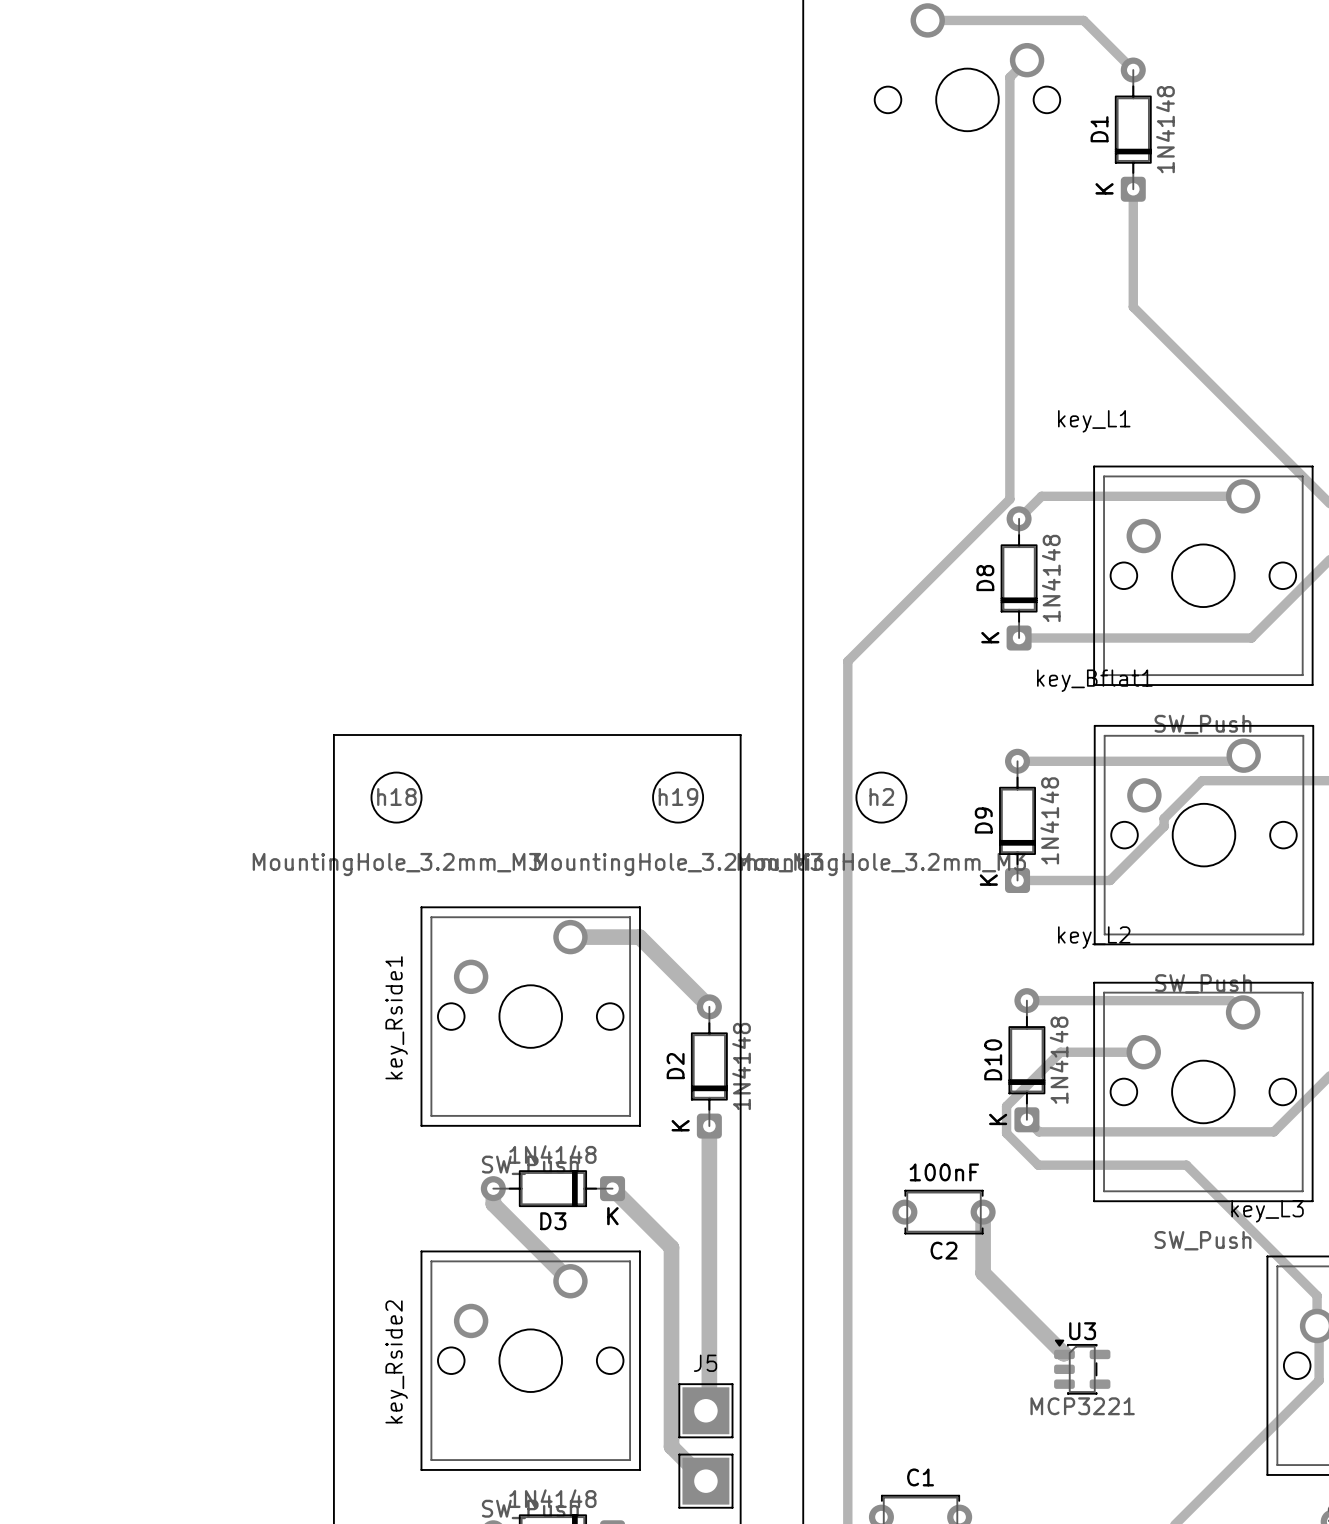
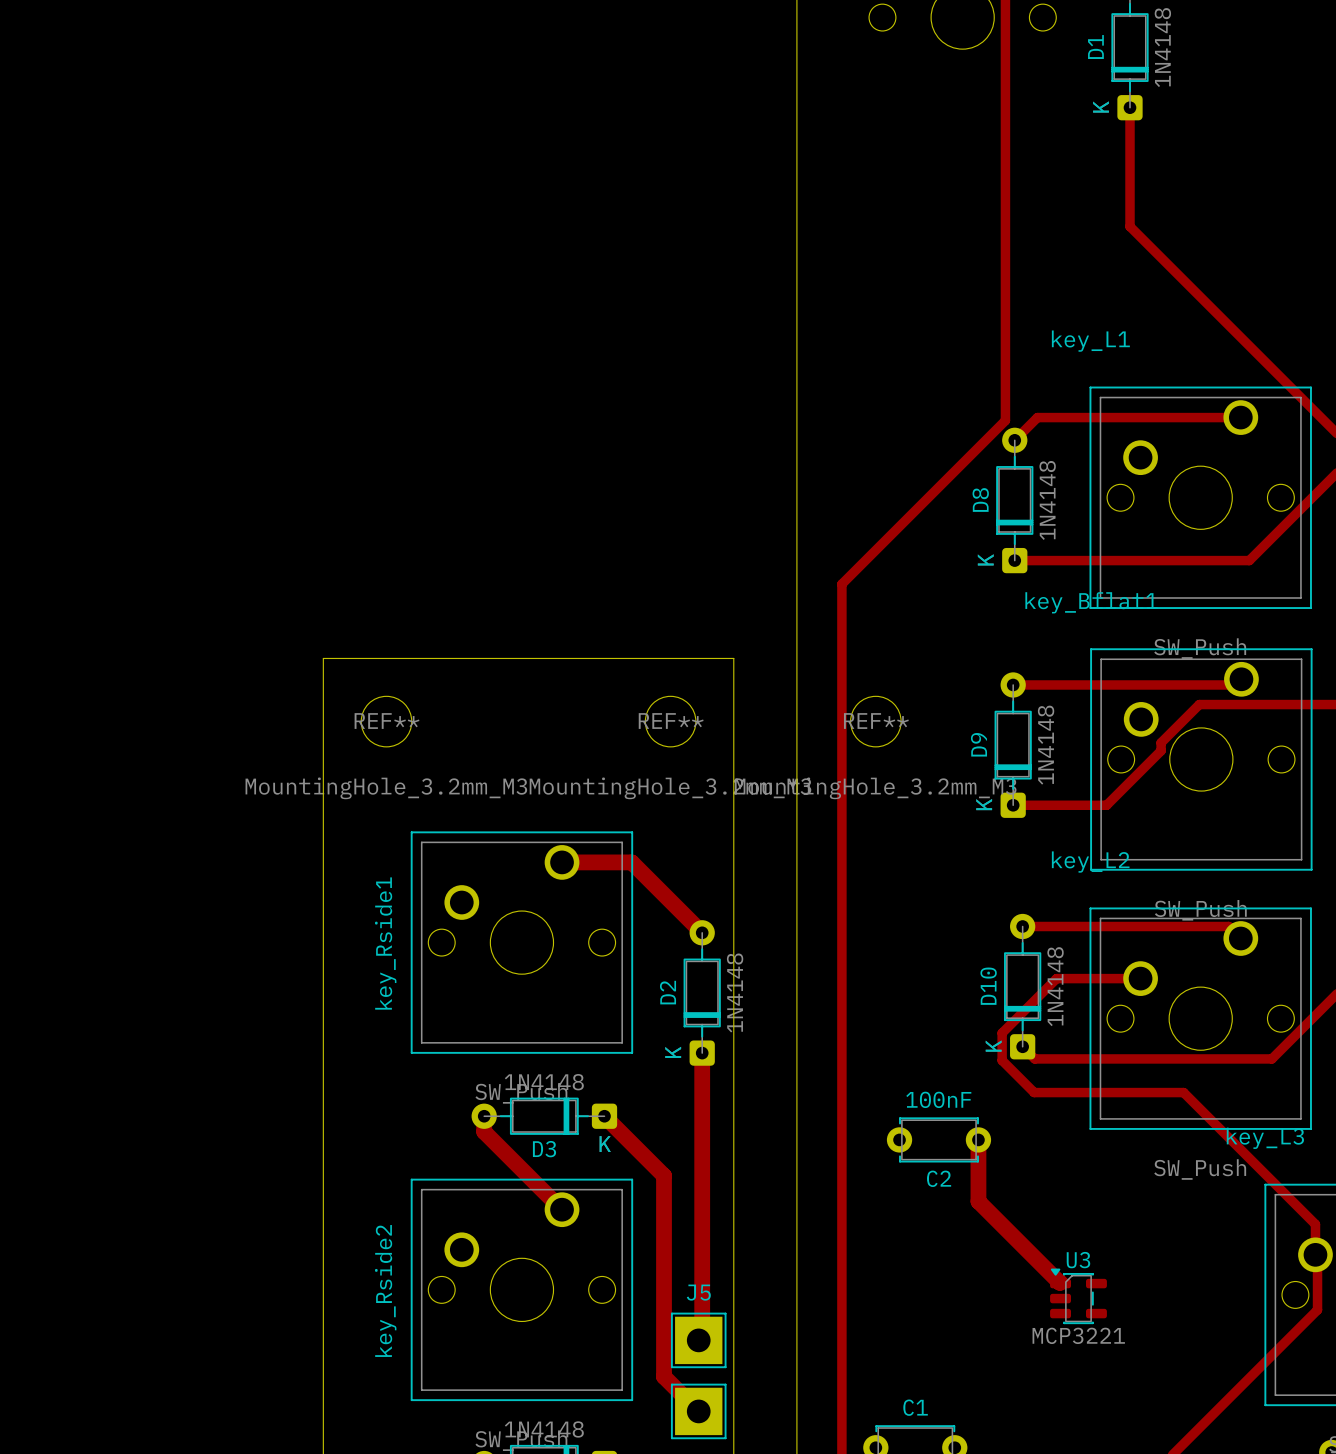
h18 name: h18 (396, 796) -> REF** (387, 721)
h19 name: h19 (678, 796) -> REF** (671, 721)
h2 name: h2 (881, 796) -> REF** (876, 721)

